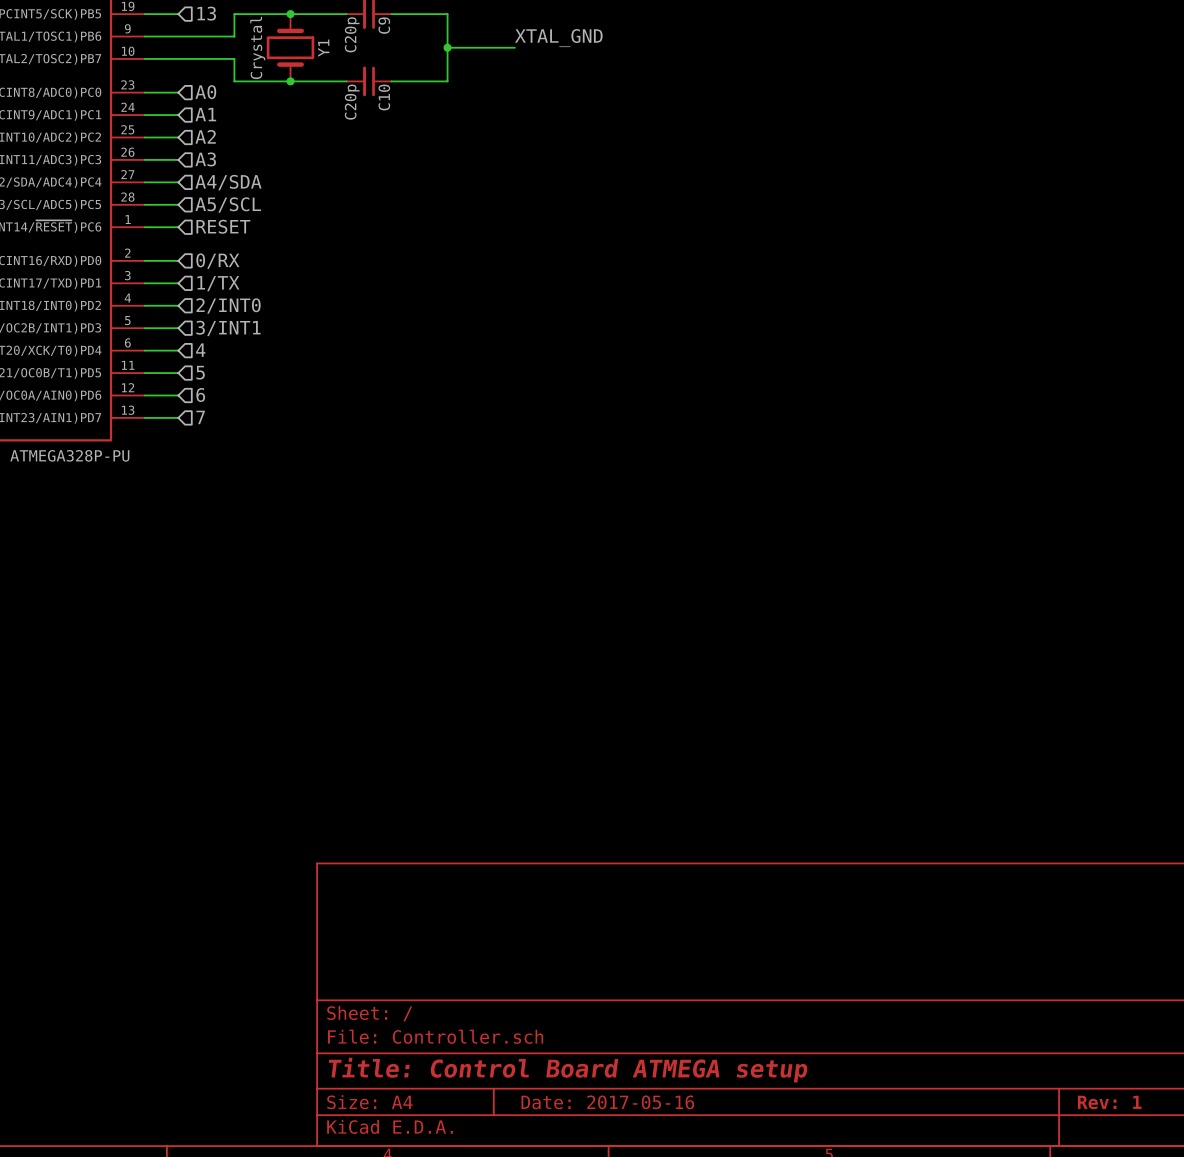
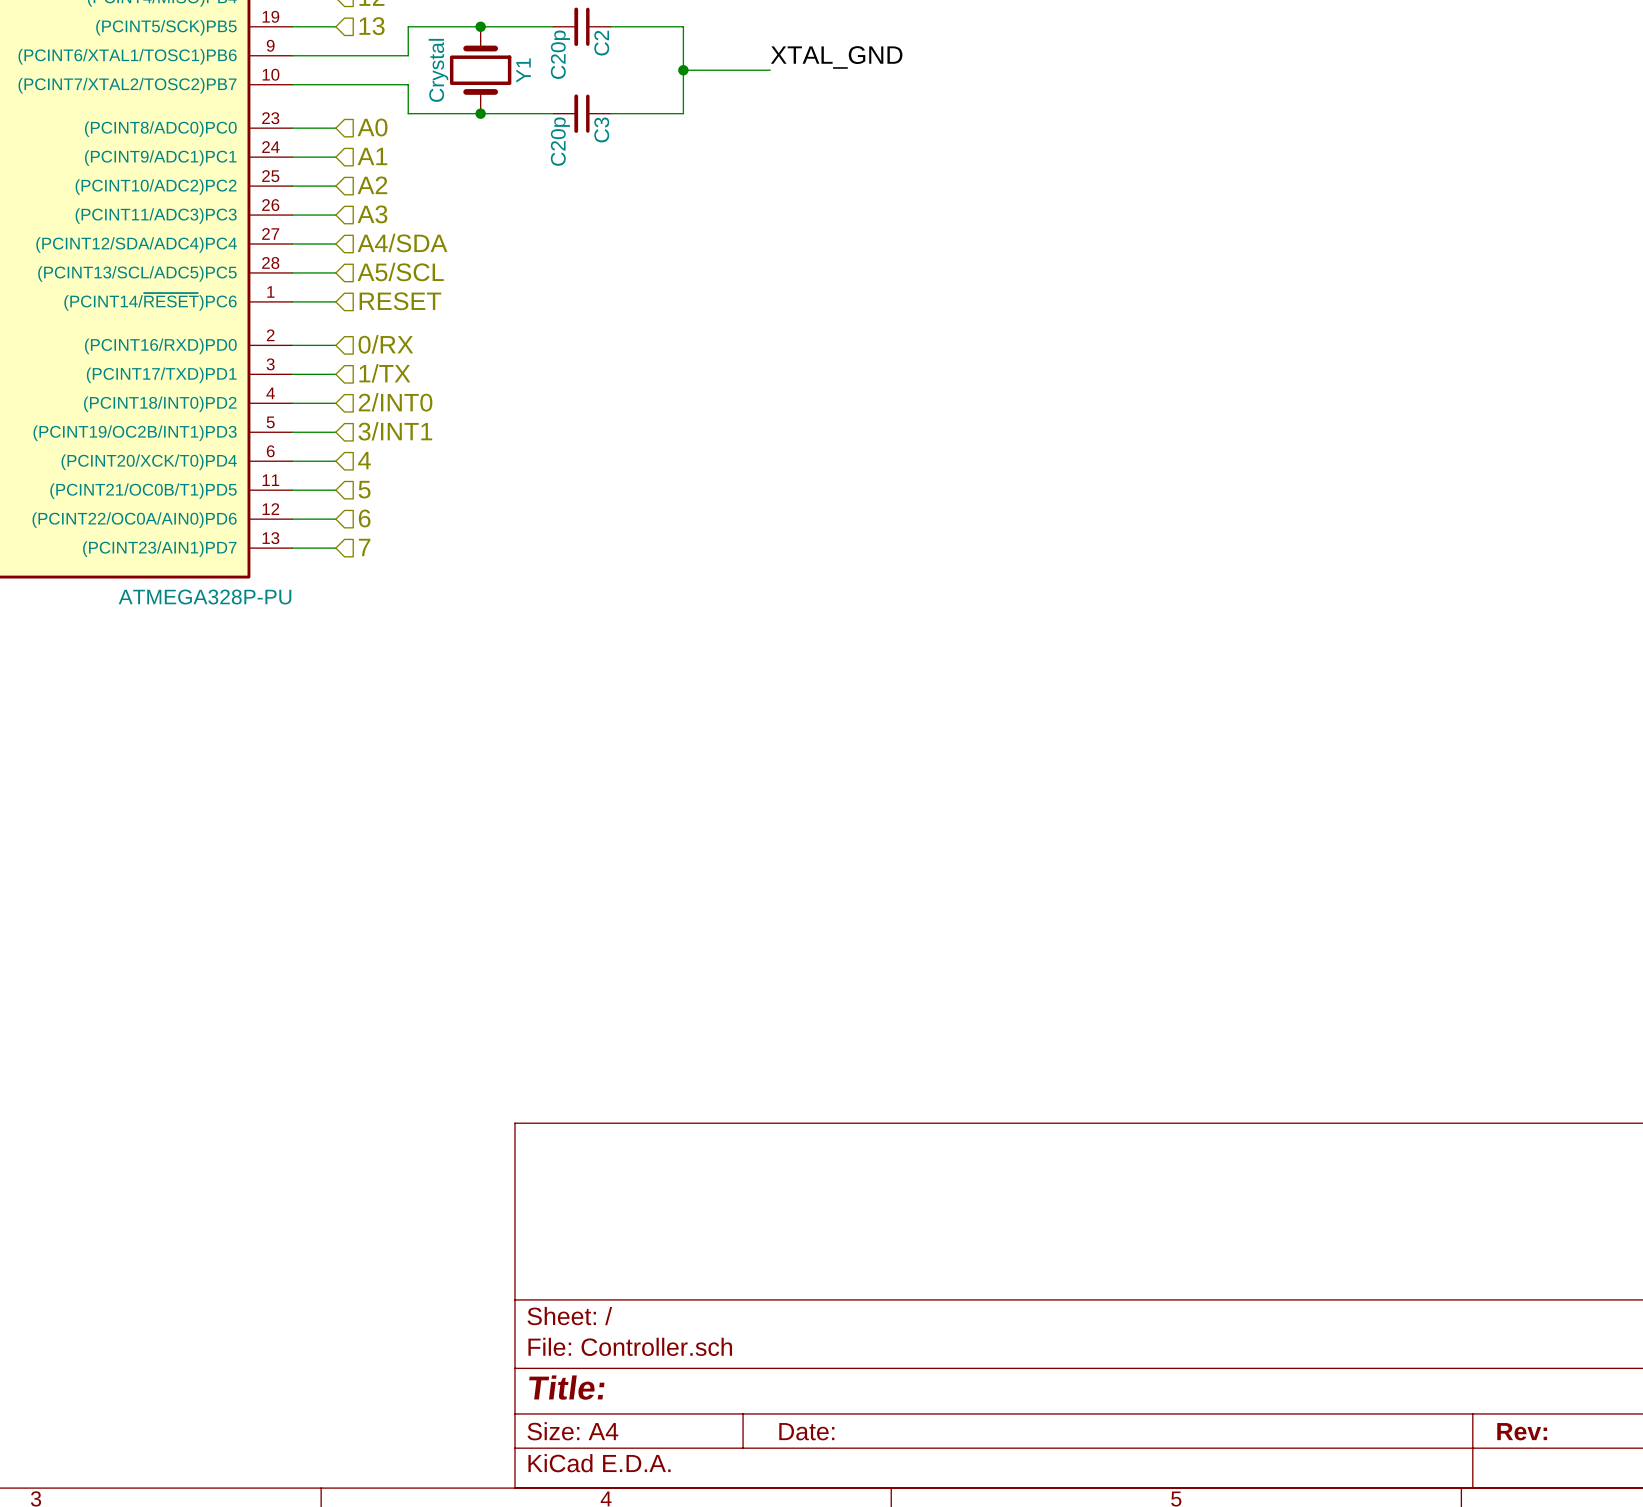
C9 name: C9 (384, 25) -> C2 (601, 43)
C10 name: C10 (384, 97) -> C3 (601, 129)
title block: Title: Control Board ATMEGA setup (568, 1070) -> Title: (566, 1387)
title block: Date: 2017-05-16 (607, 1102) -> Date: (806, 1431)
title block: Rev: 1 (1109, 1102) -> Rev: (1522, 1431)

